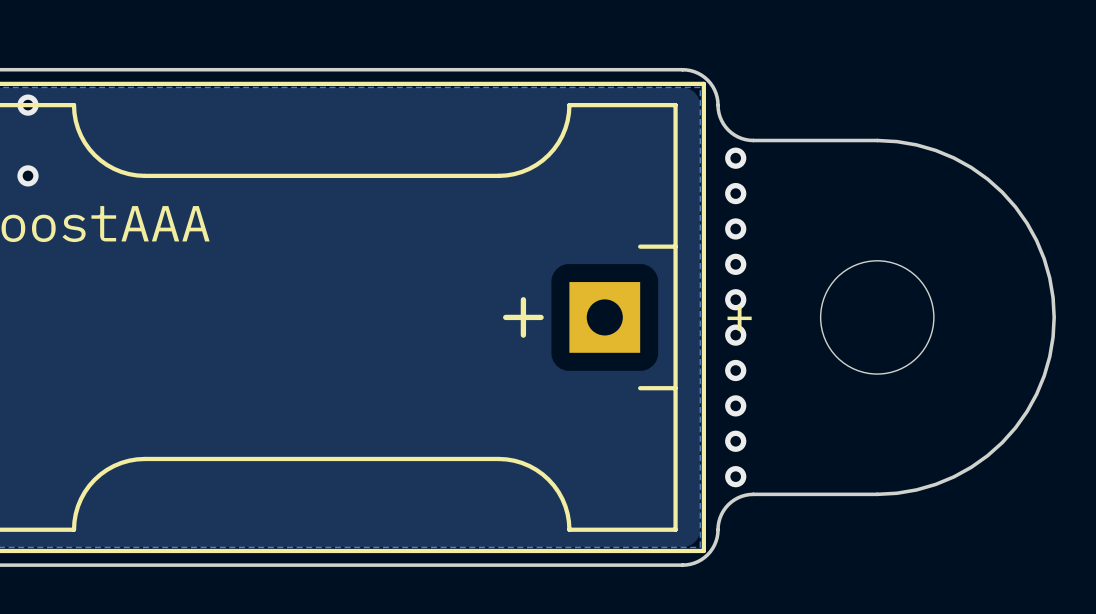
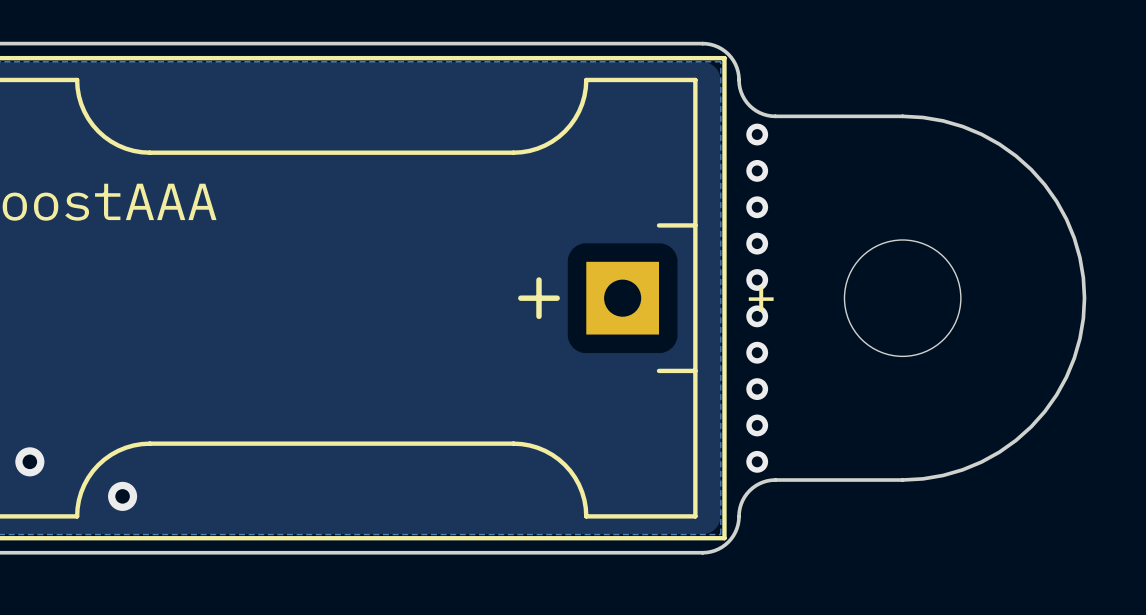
via: (28, 105) -> none
via: (28, 175) -> none
via: none -> (29, 461)
via: none -> (122, 496)

